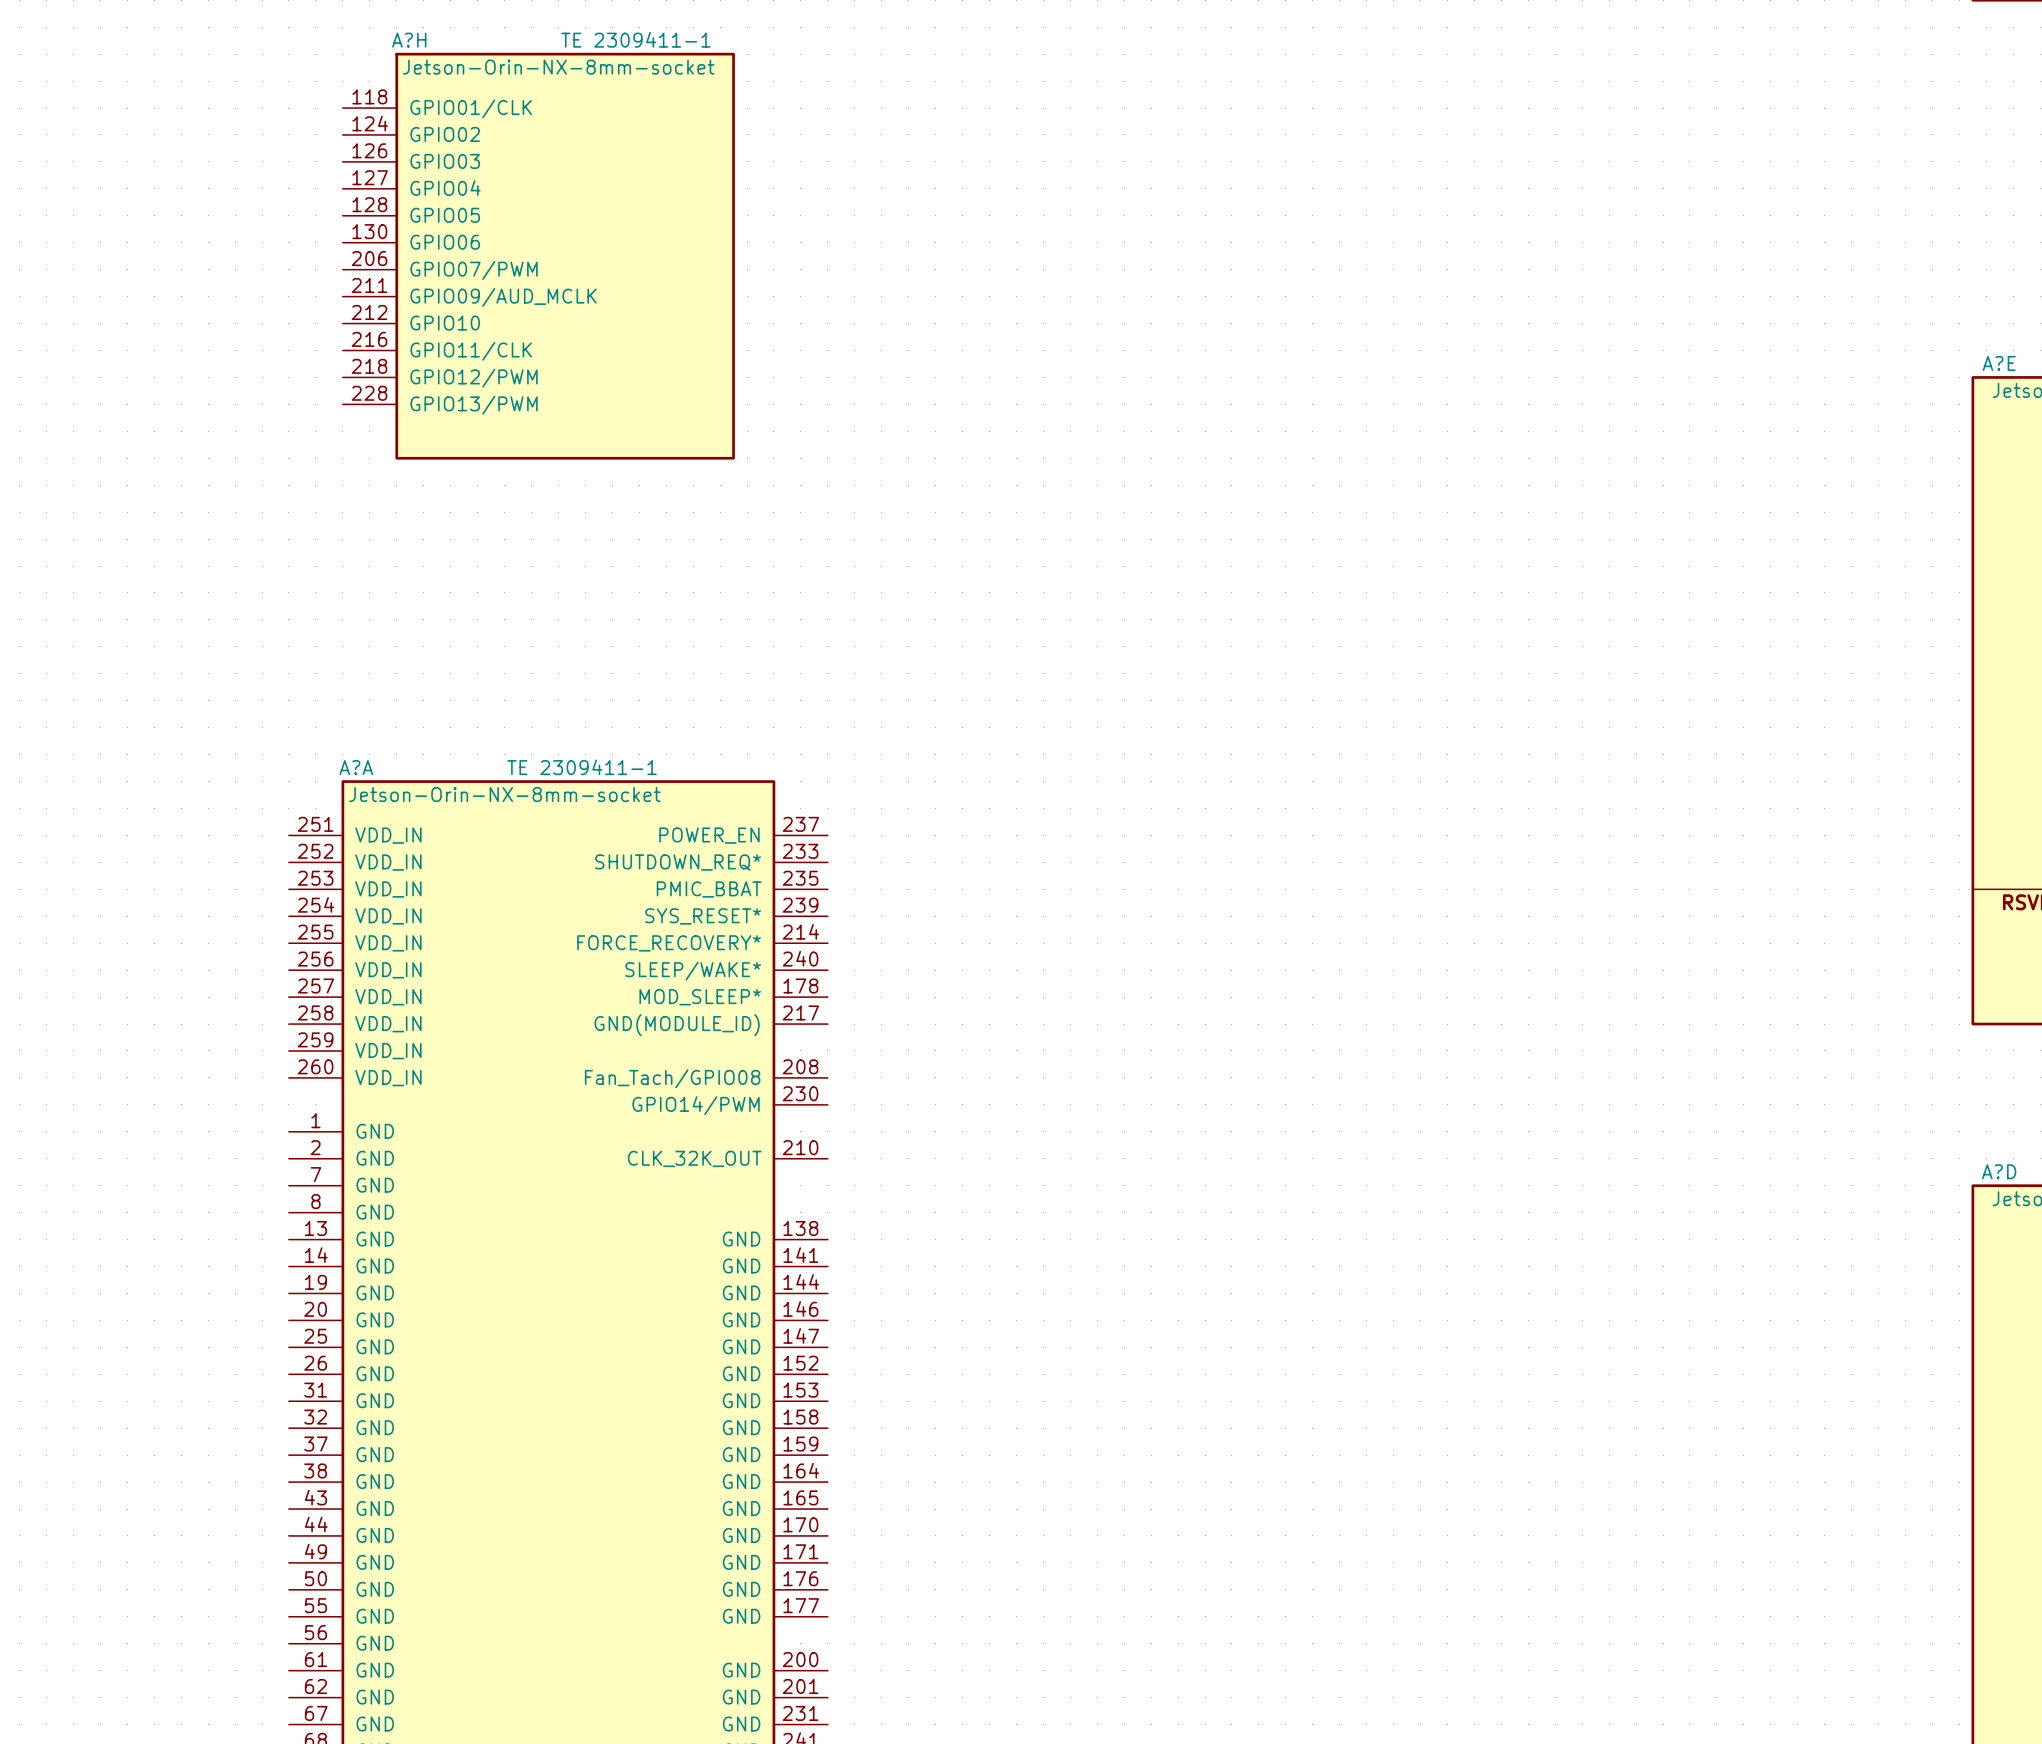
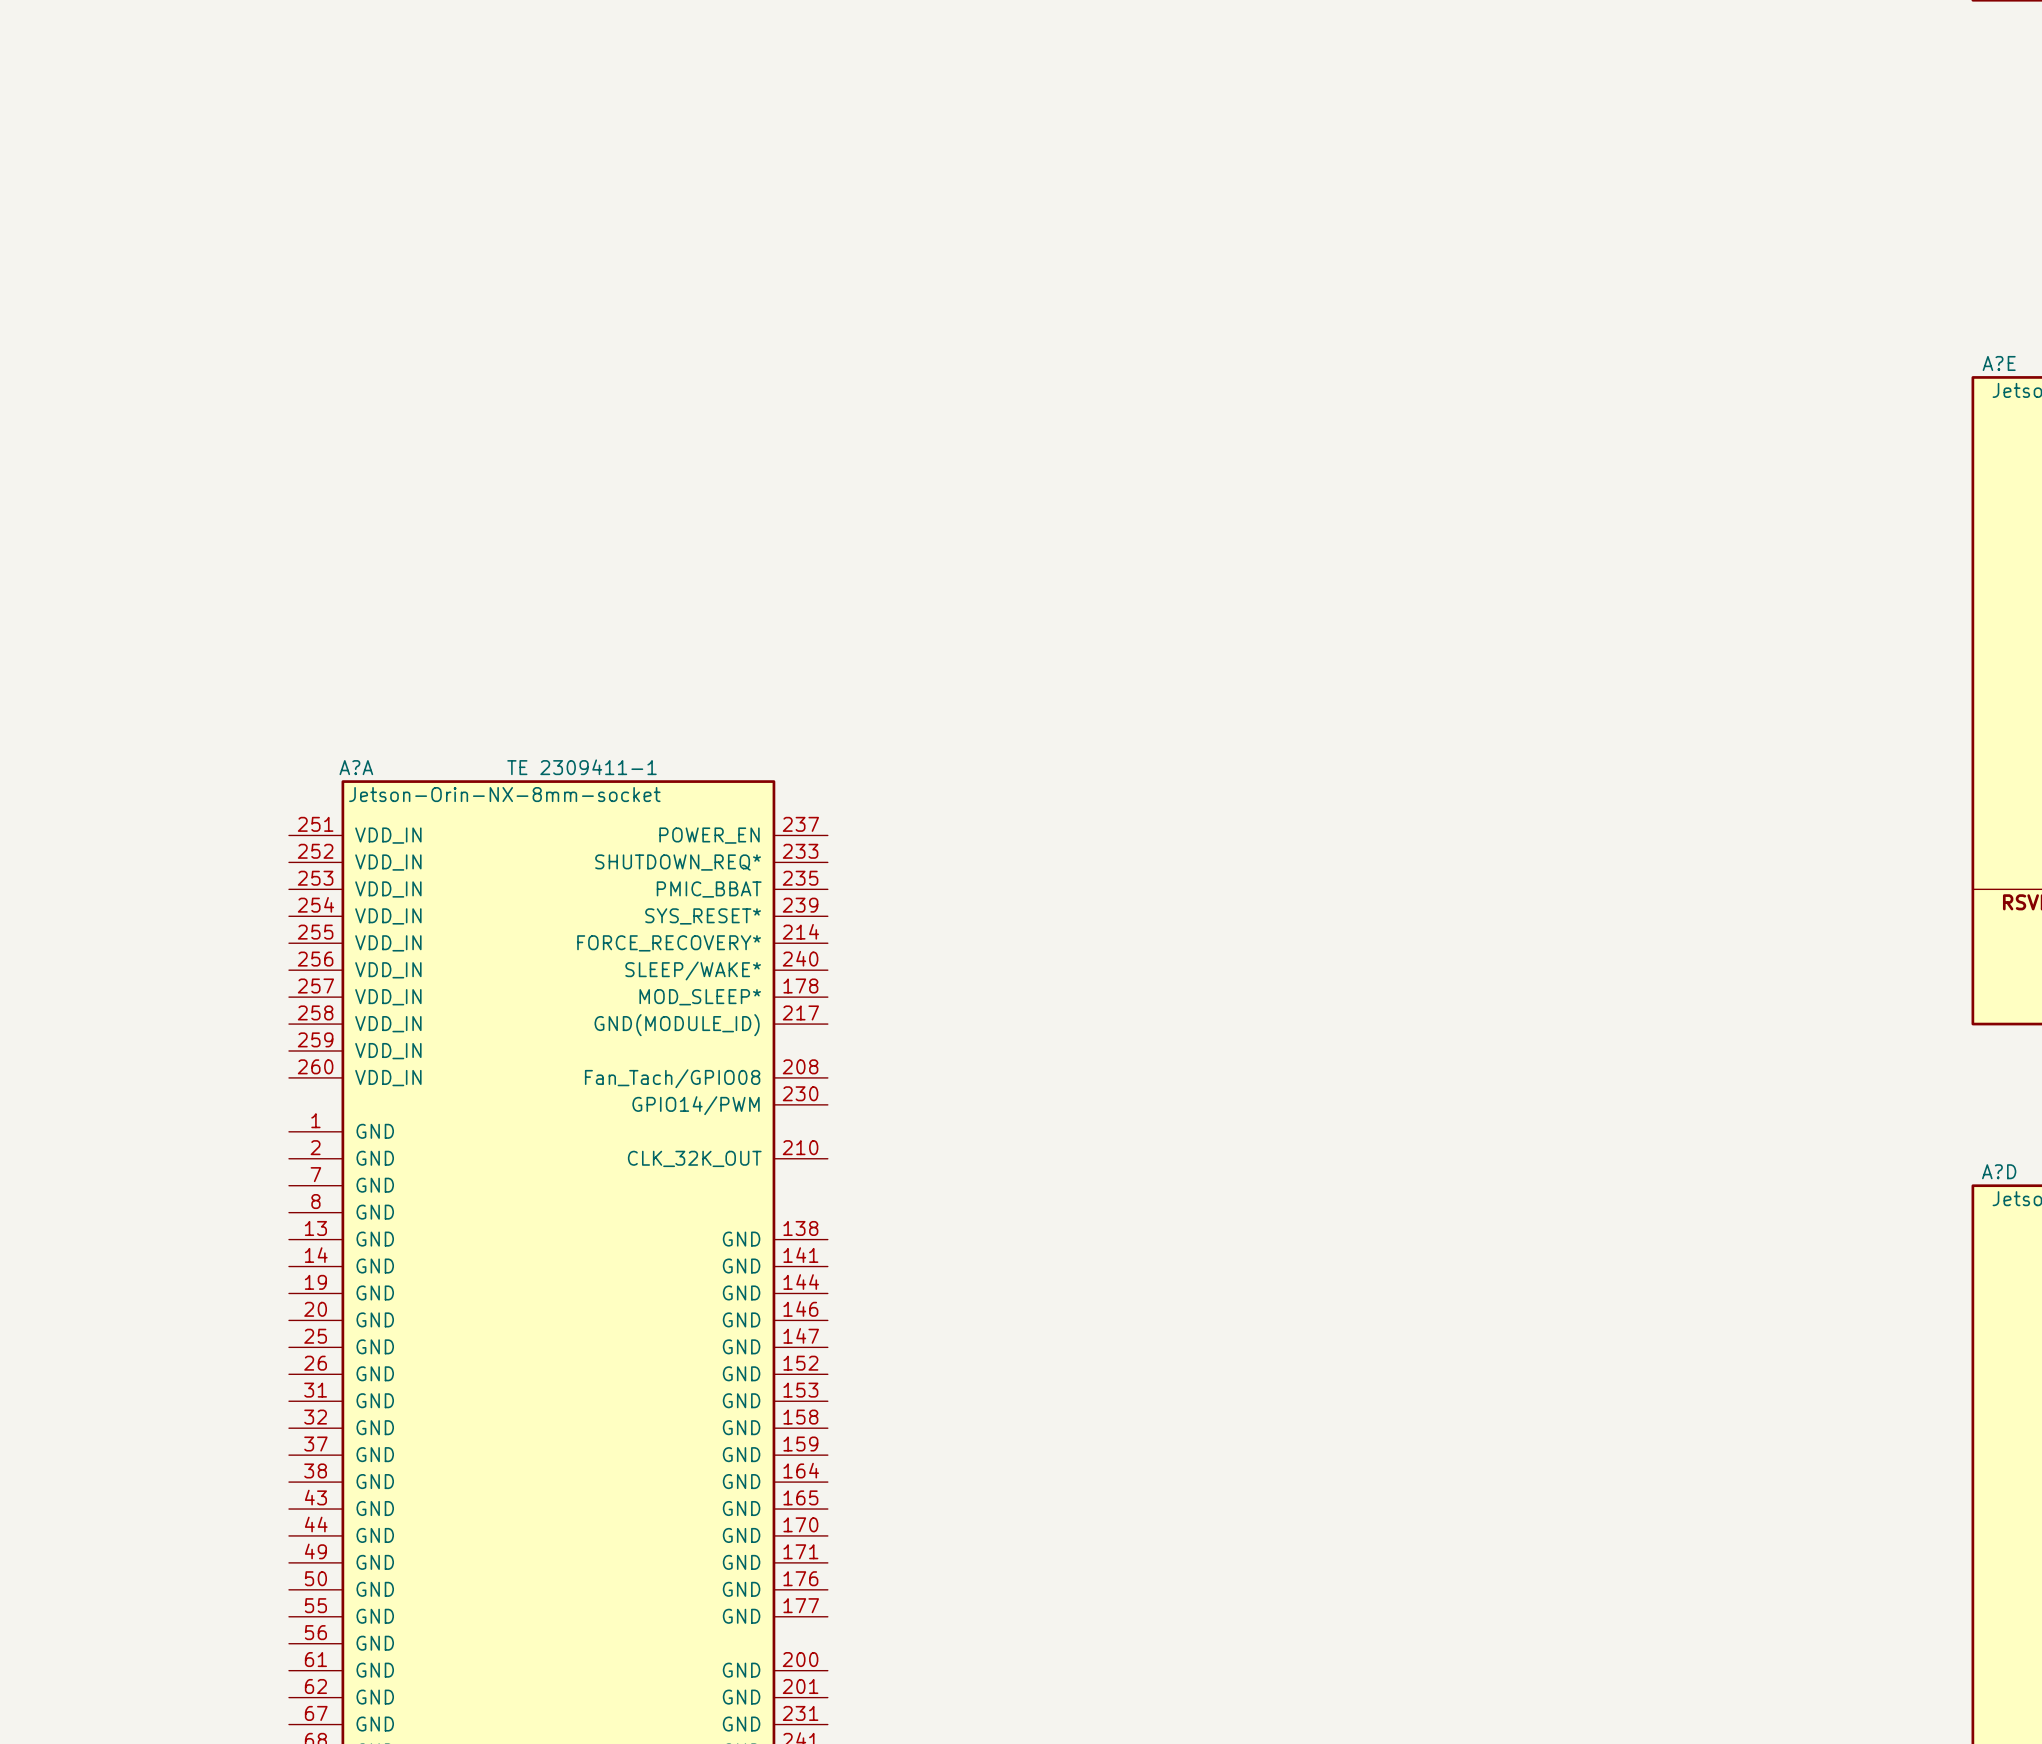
A?H: Jetson-Orin-NX-8mm-socket (538, 256) -> none

